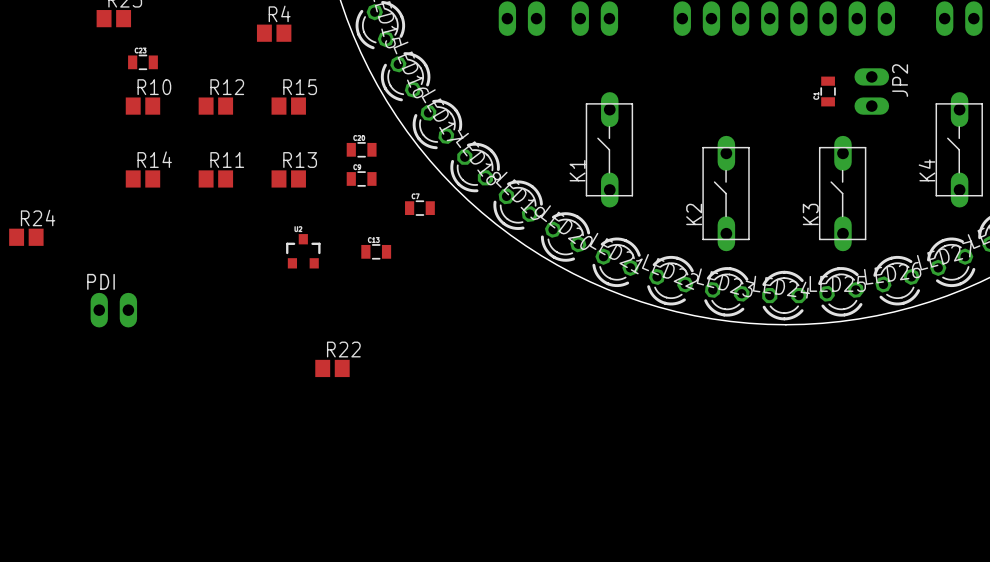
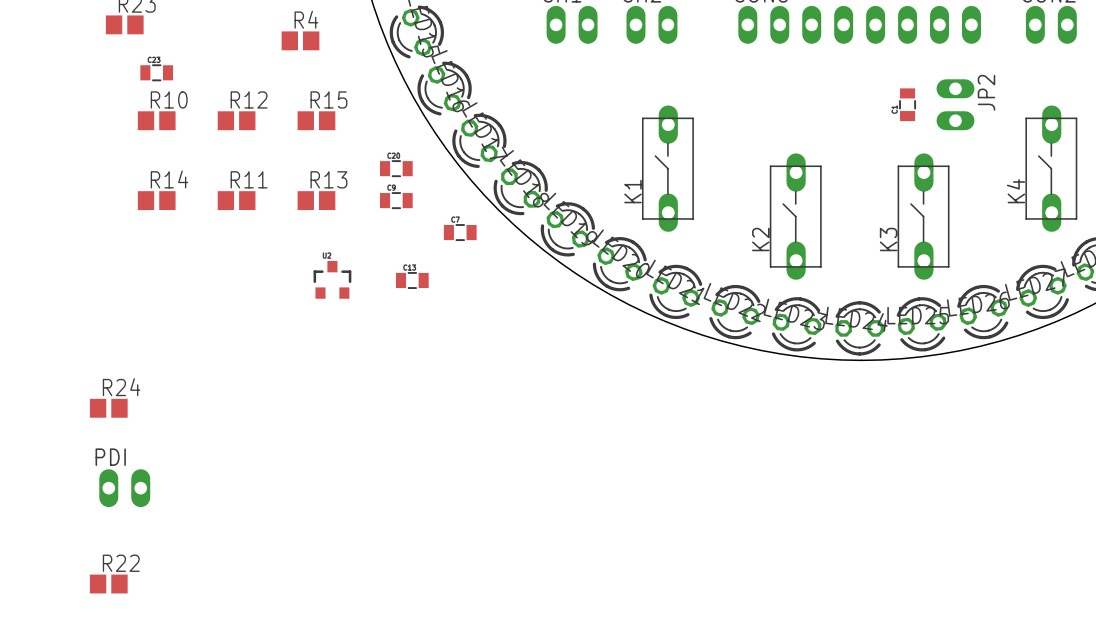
R24 position: (26, 237) -> (108, 408)
PDI position: (113, 310) -> (124, 488)
R22 position: (332, 368) -> (108, 584)

